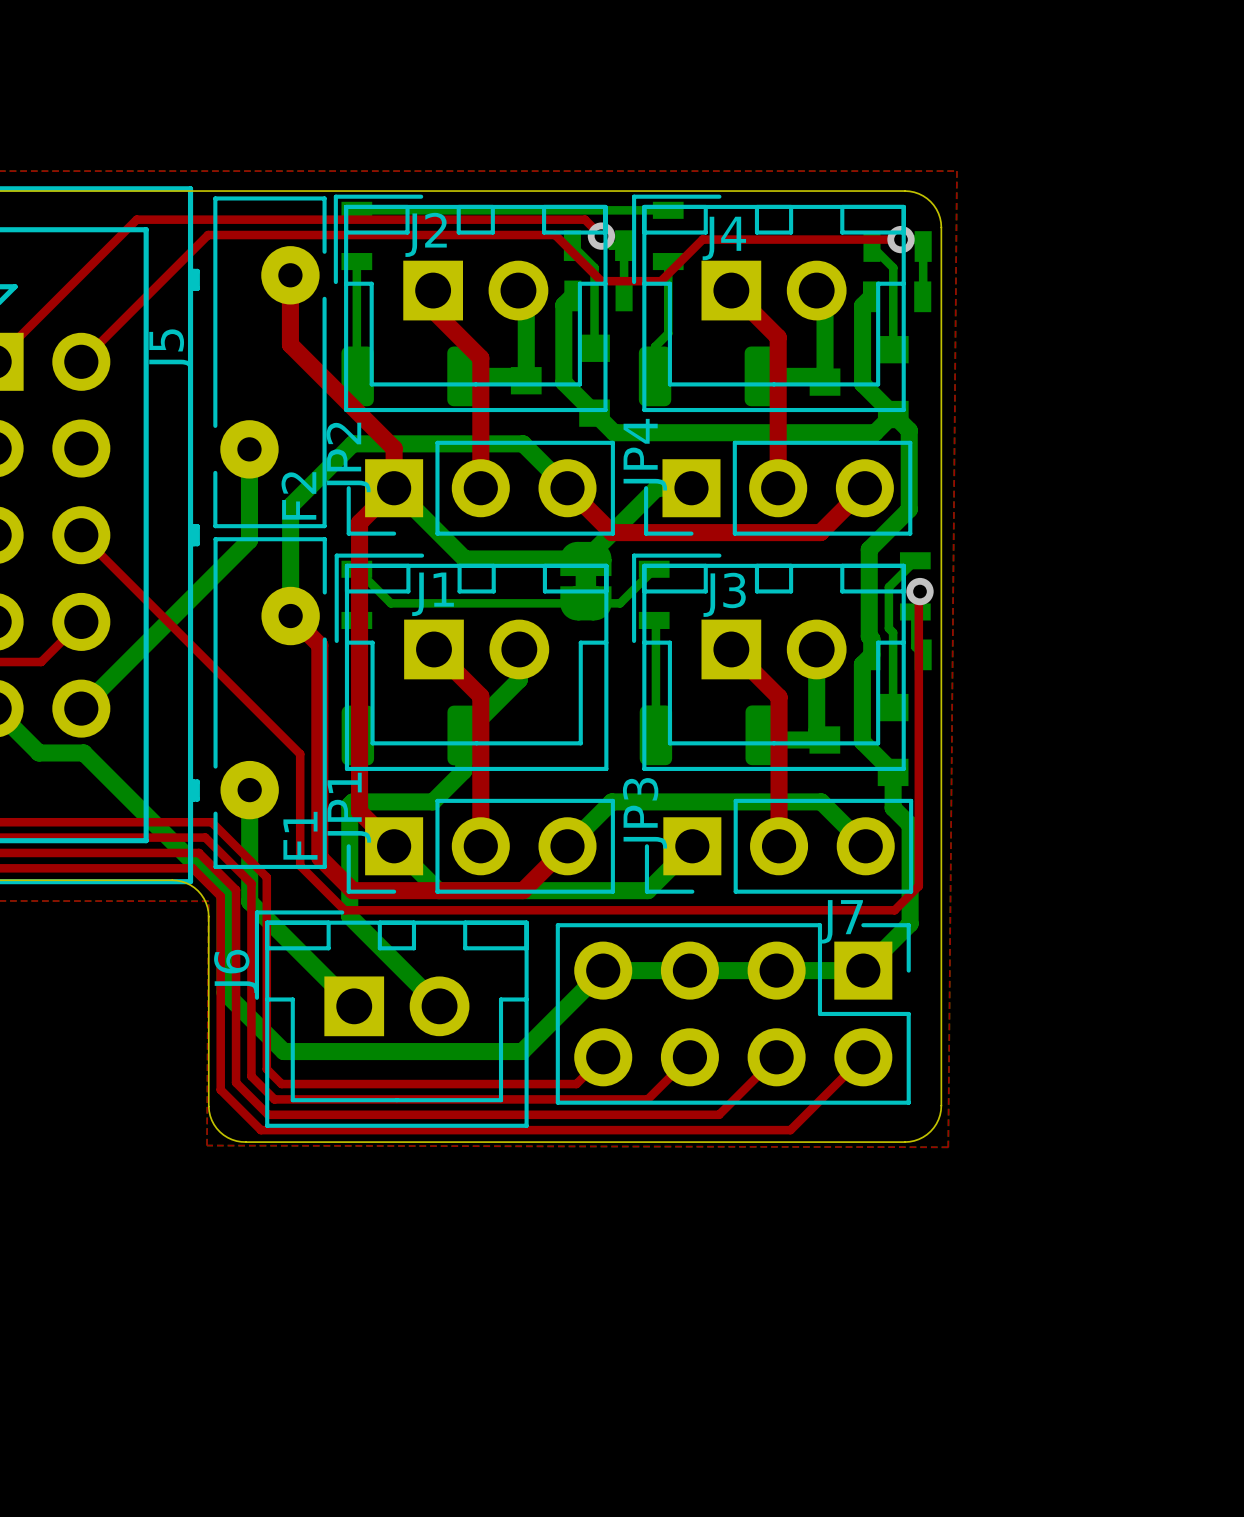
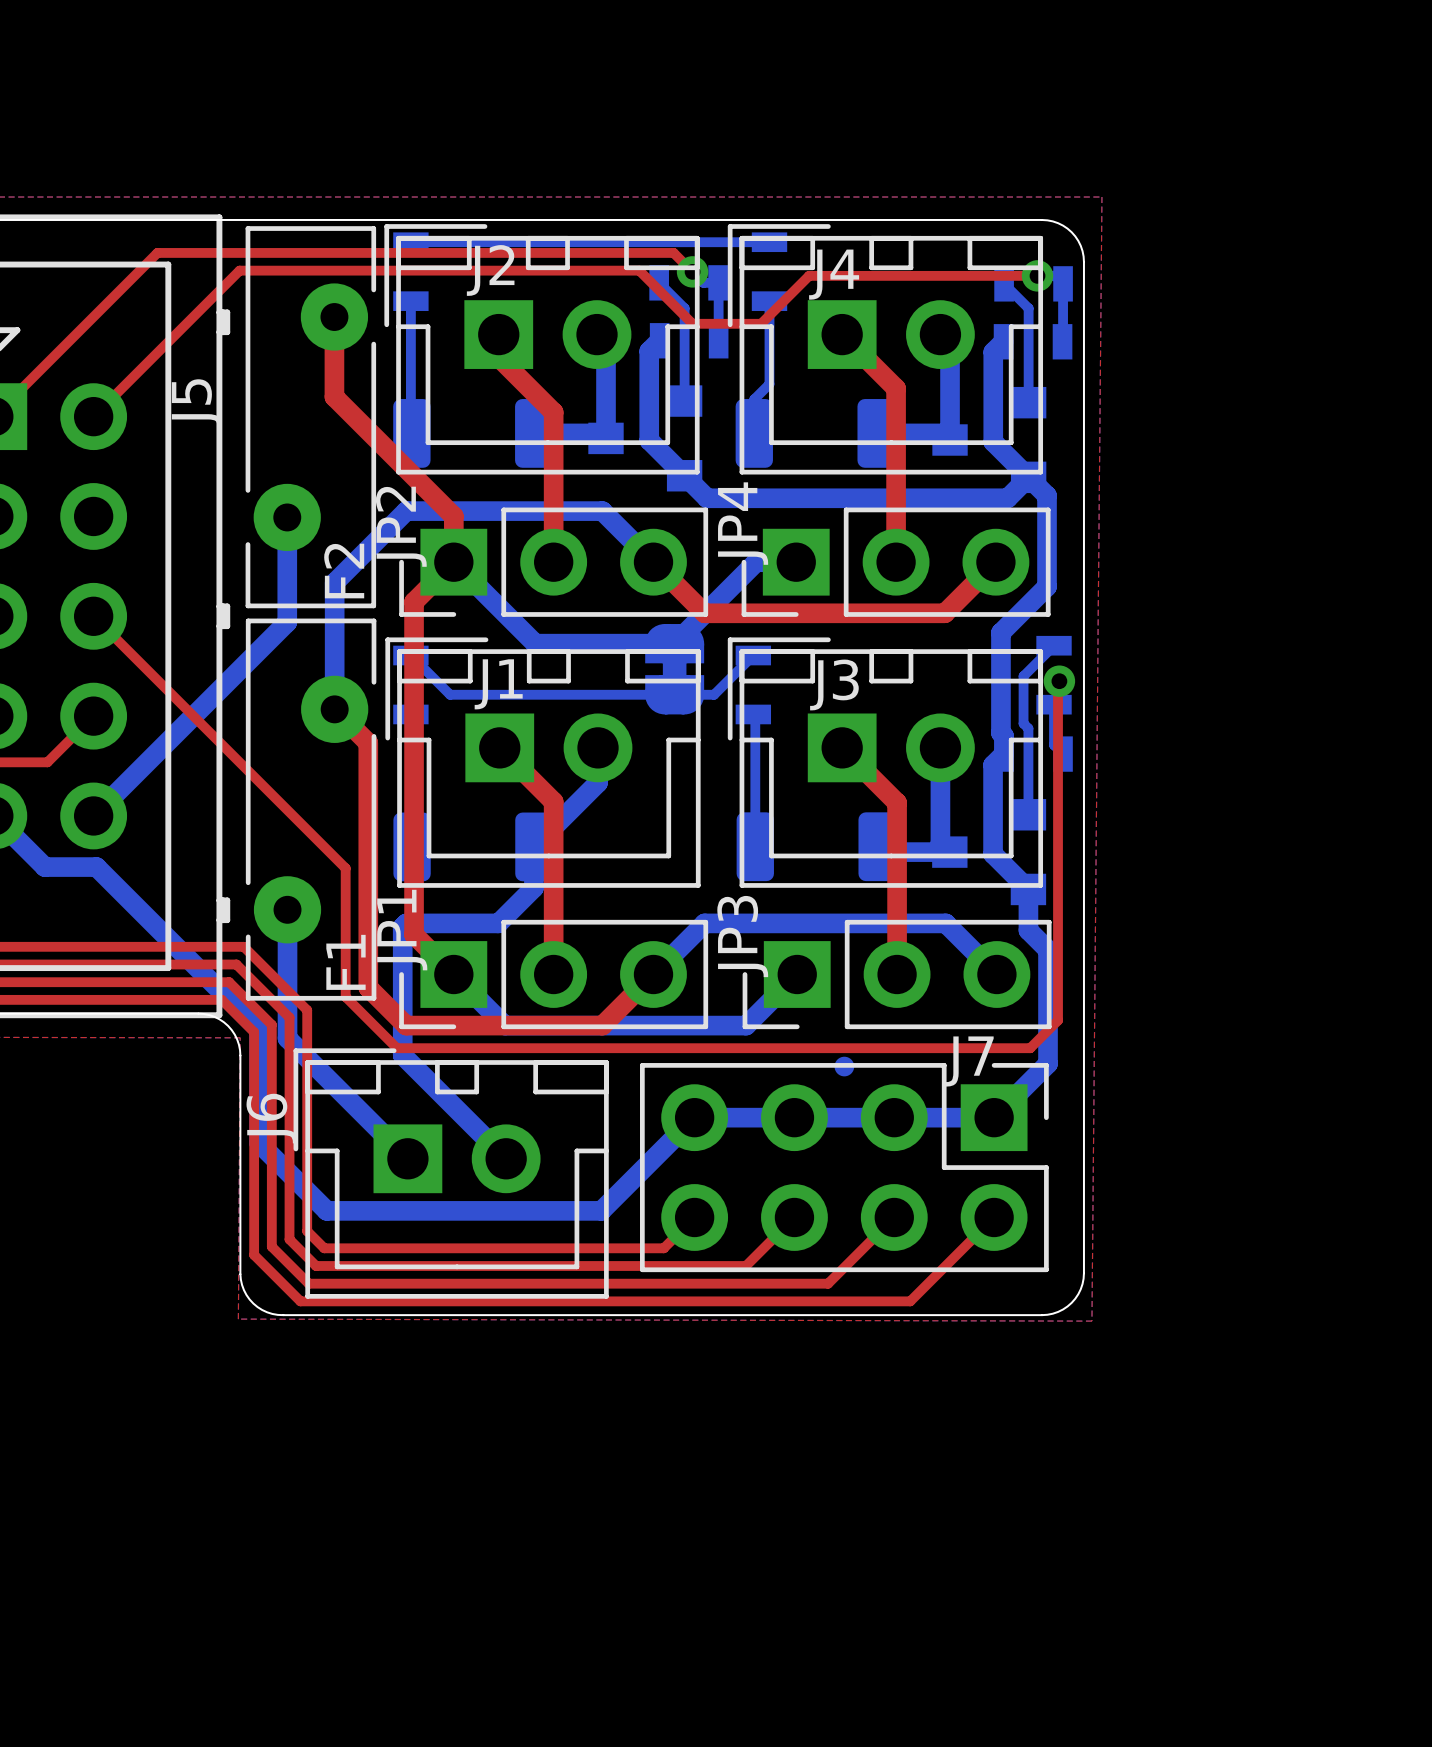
part: none -> (844, 1066)

